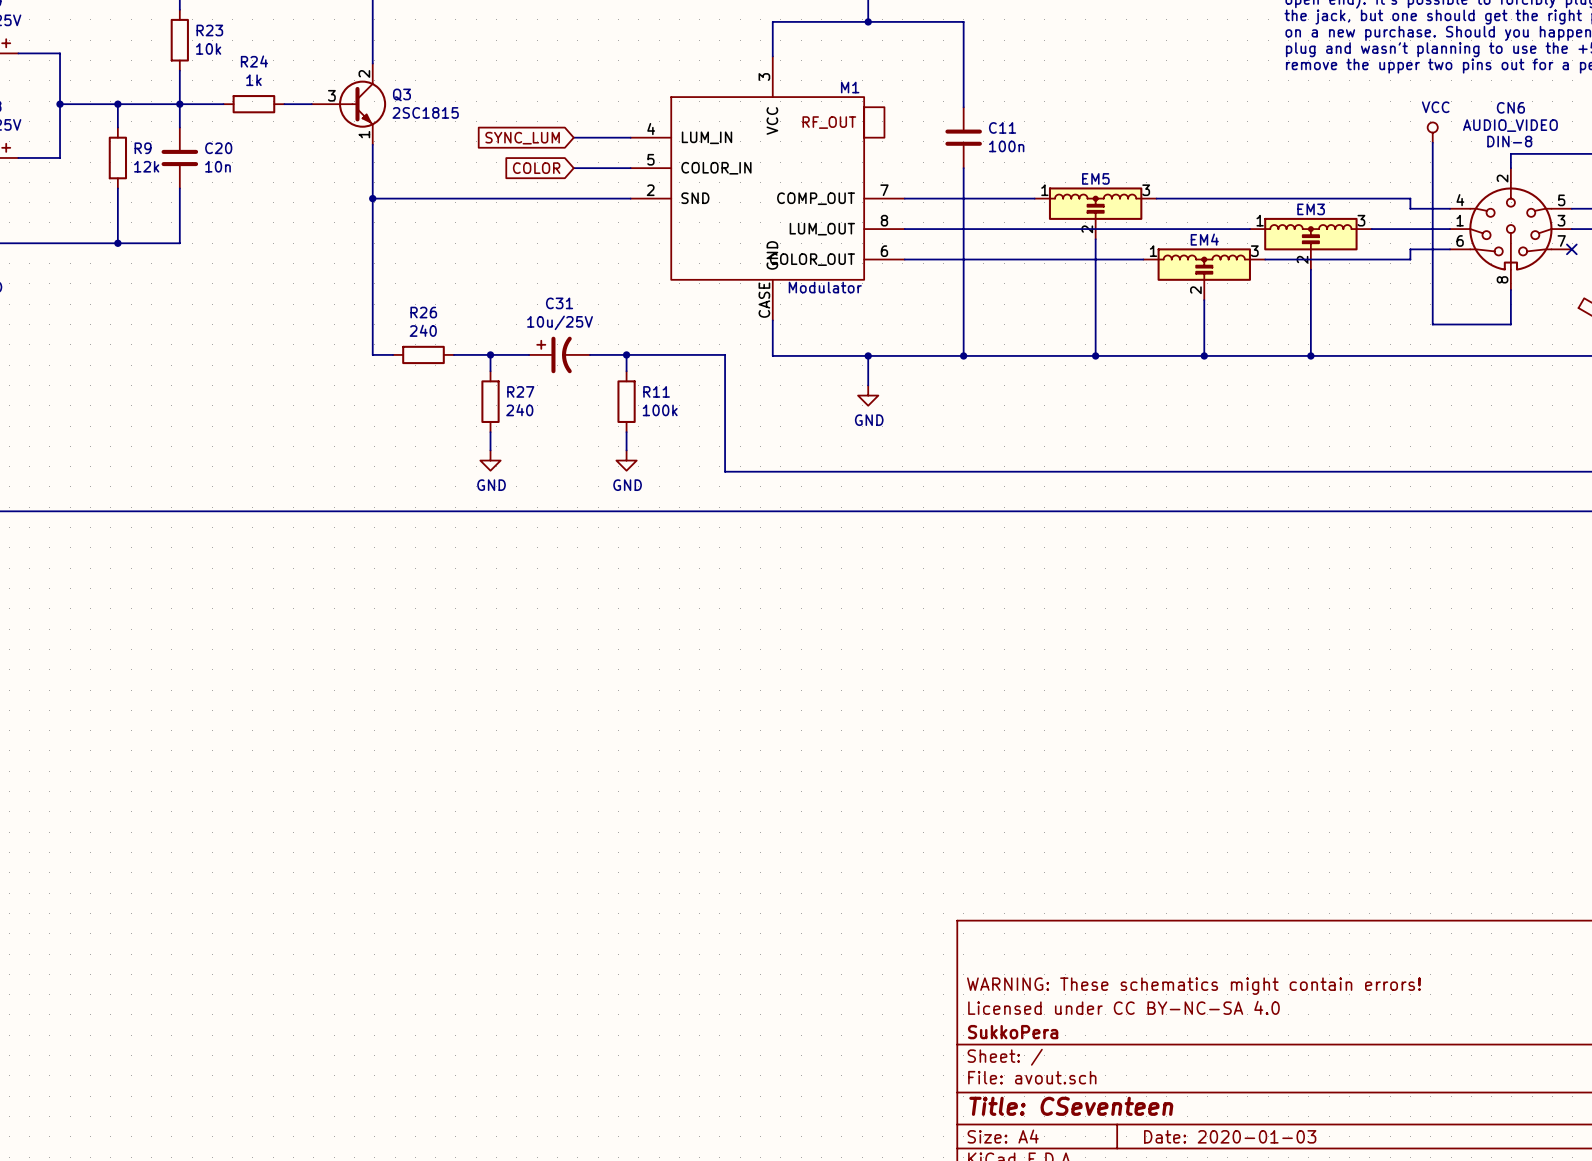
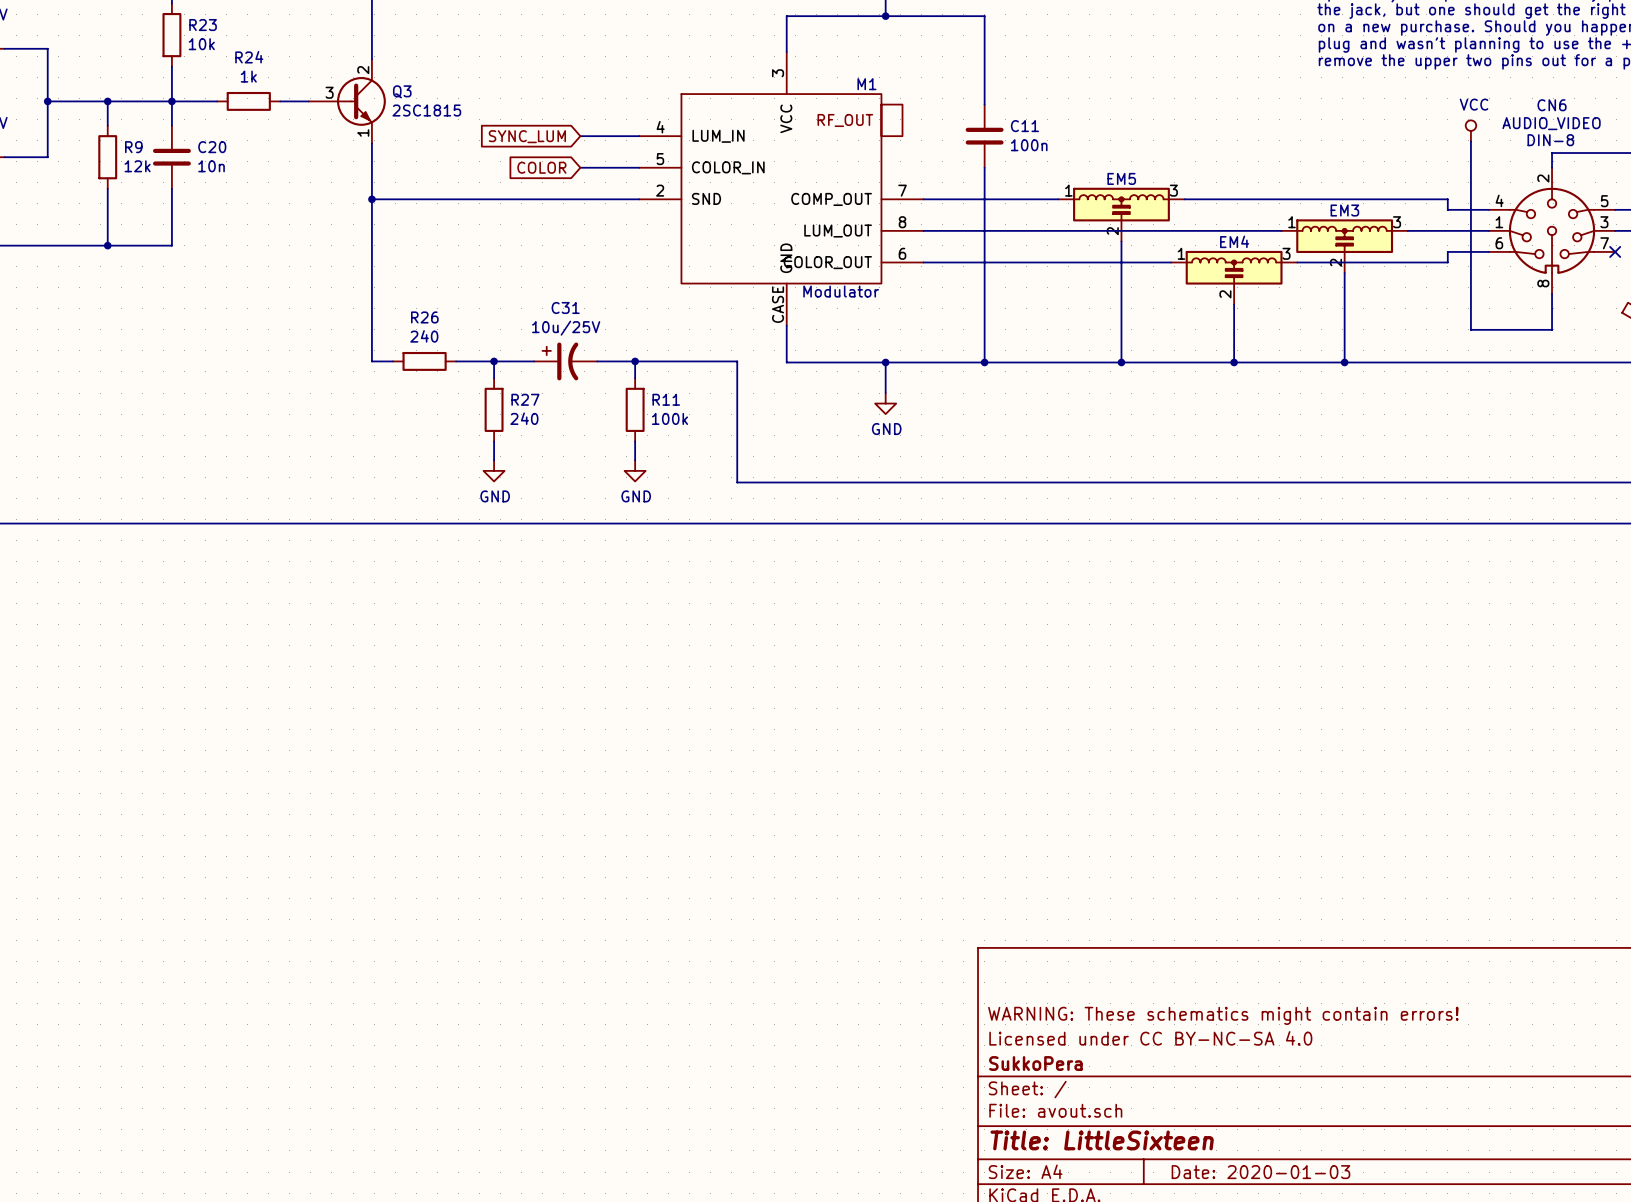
title block: Title: CSeventeen (1071, 1106) -> Title: LittleSixteen (1102, 1140)

